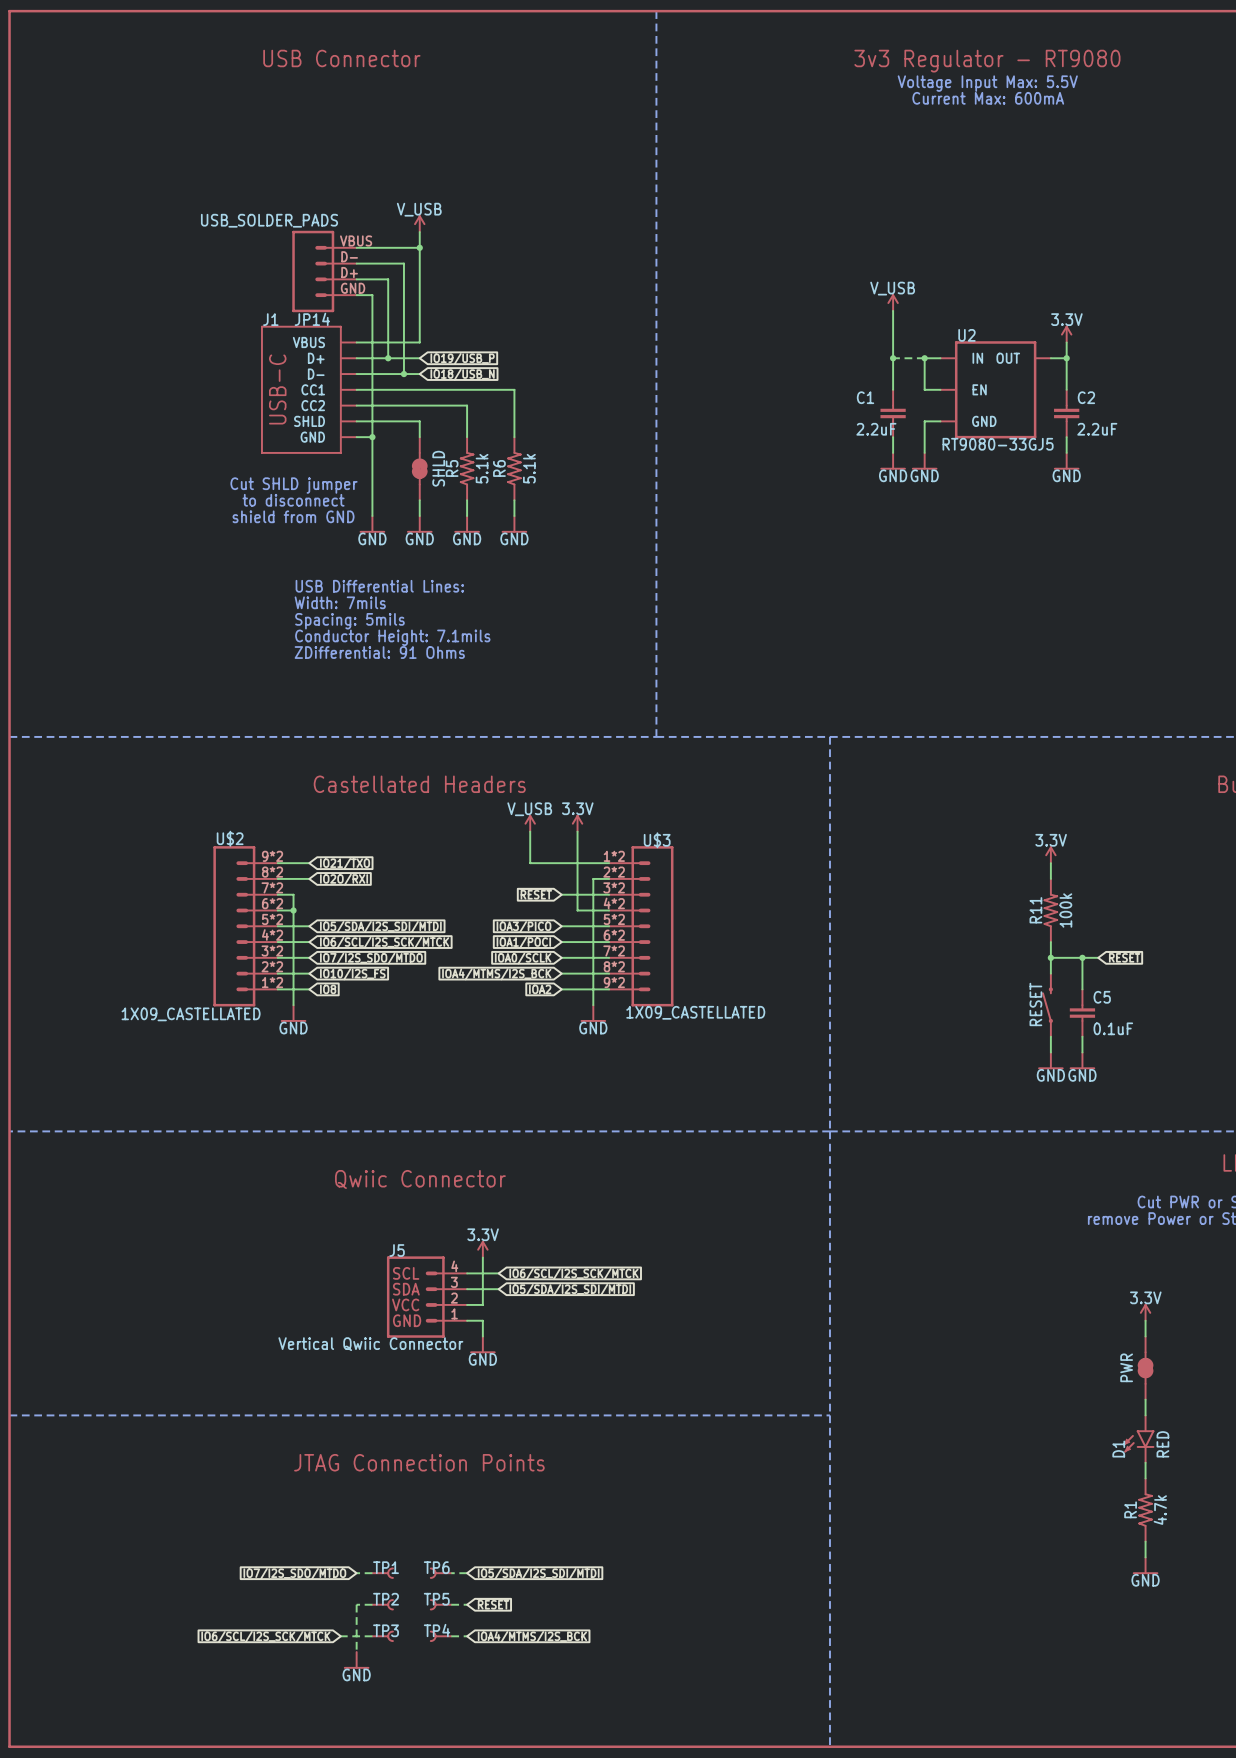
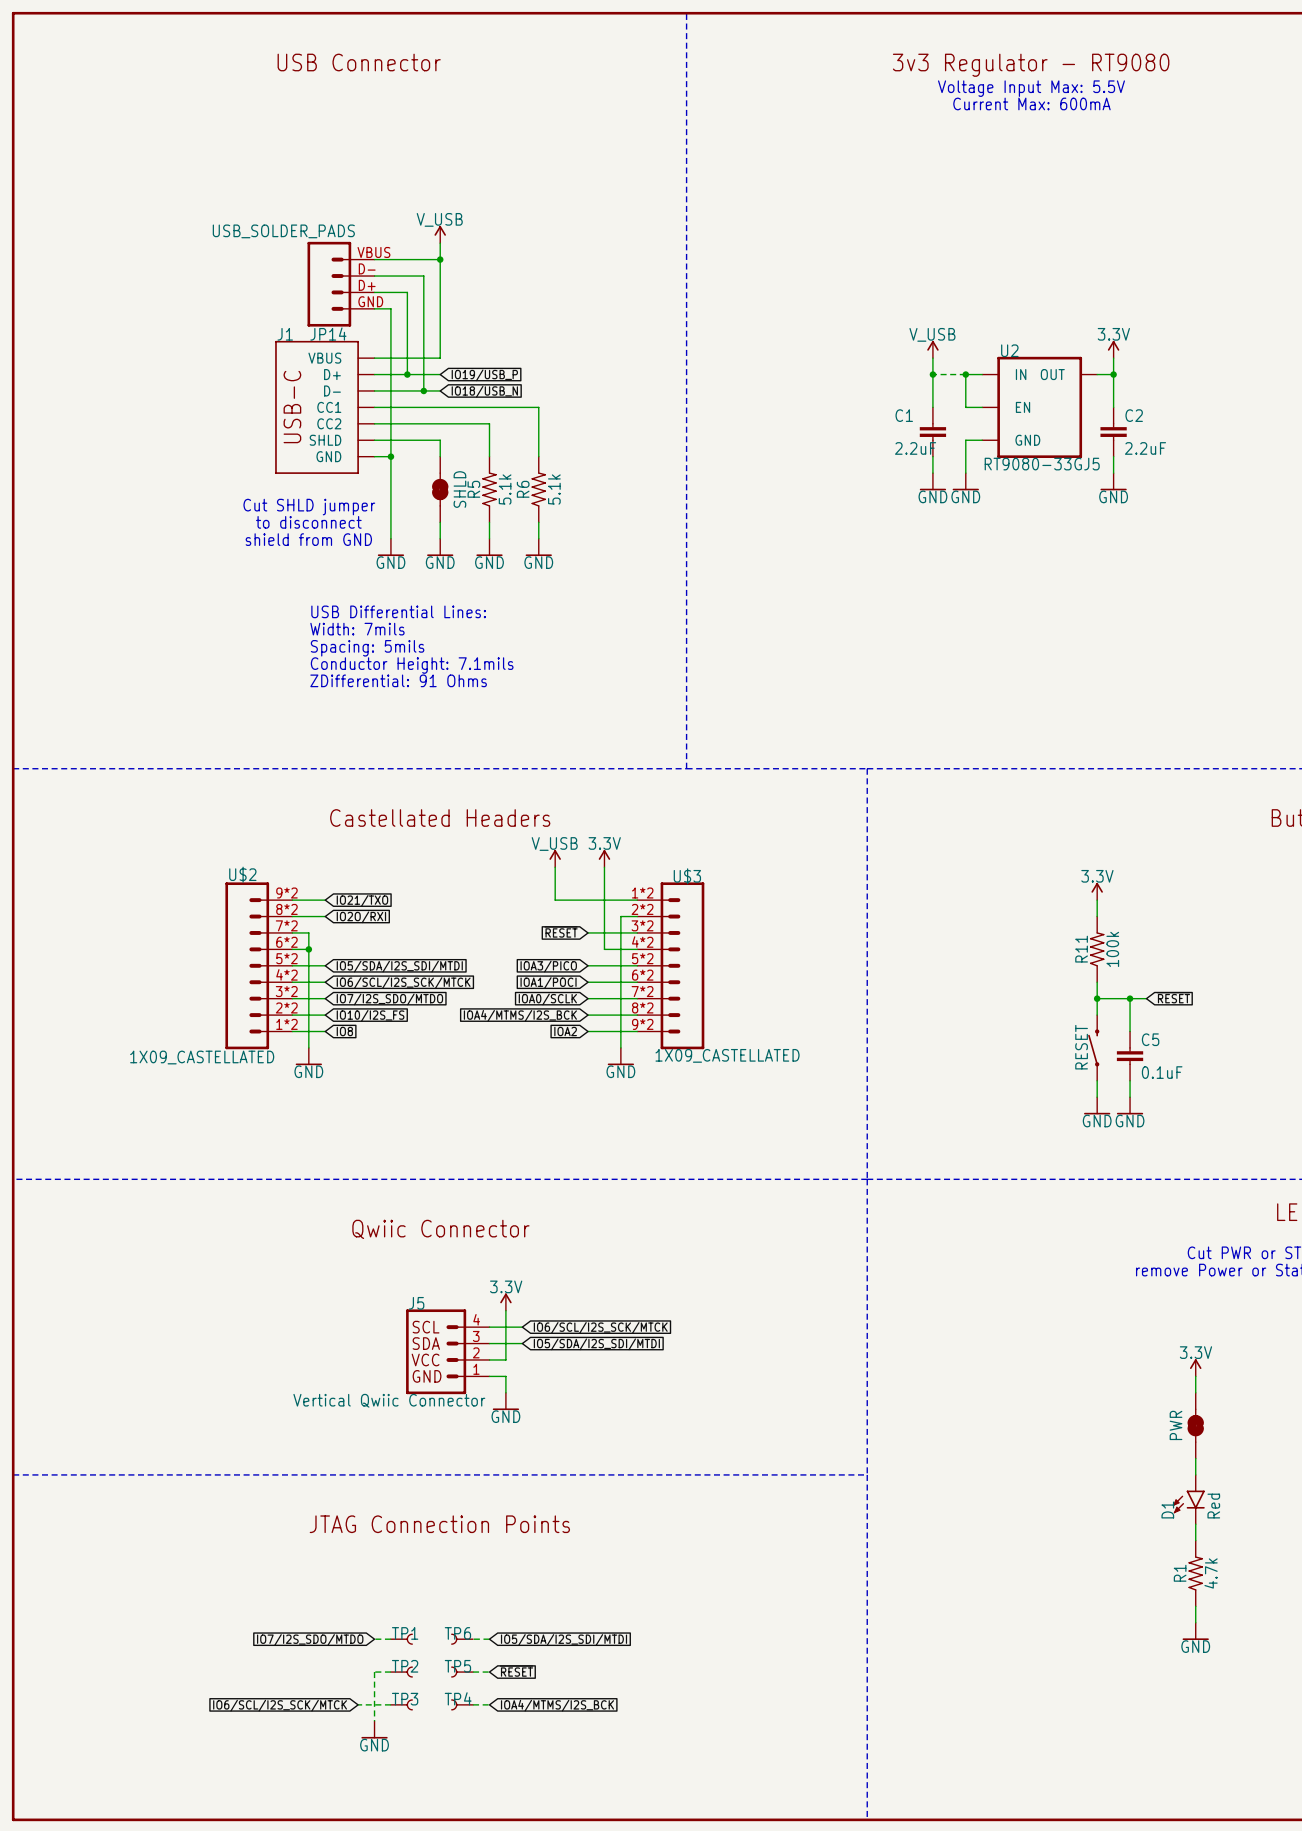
power symbol position: V_USB (893, 302) -> V_USB (932, 349)
D1 value: RED (1162, 1444) -> Red (1213, 1506)

